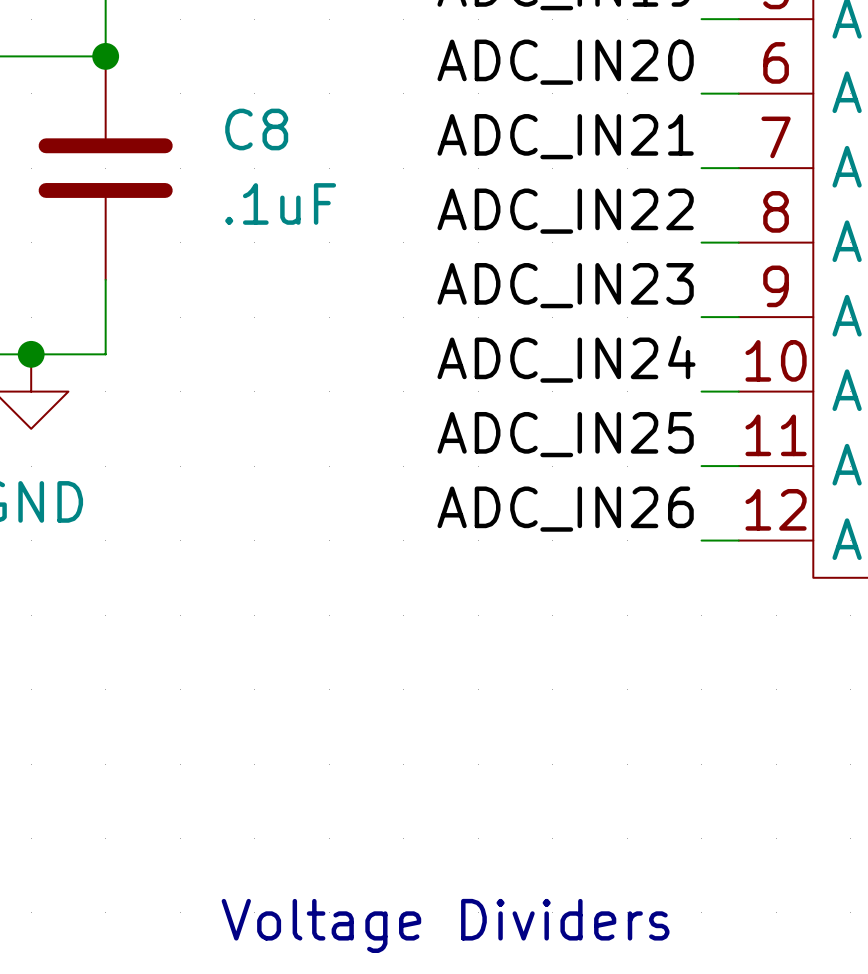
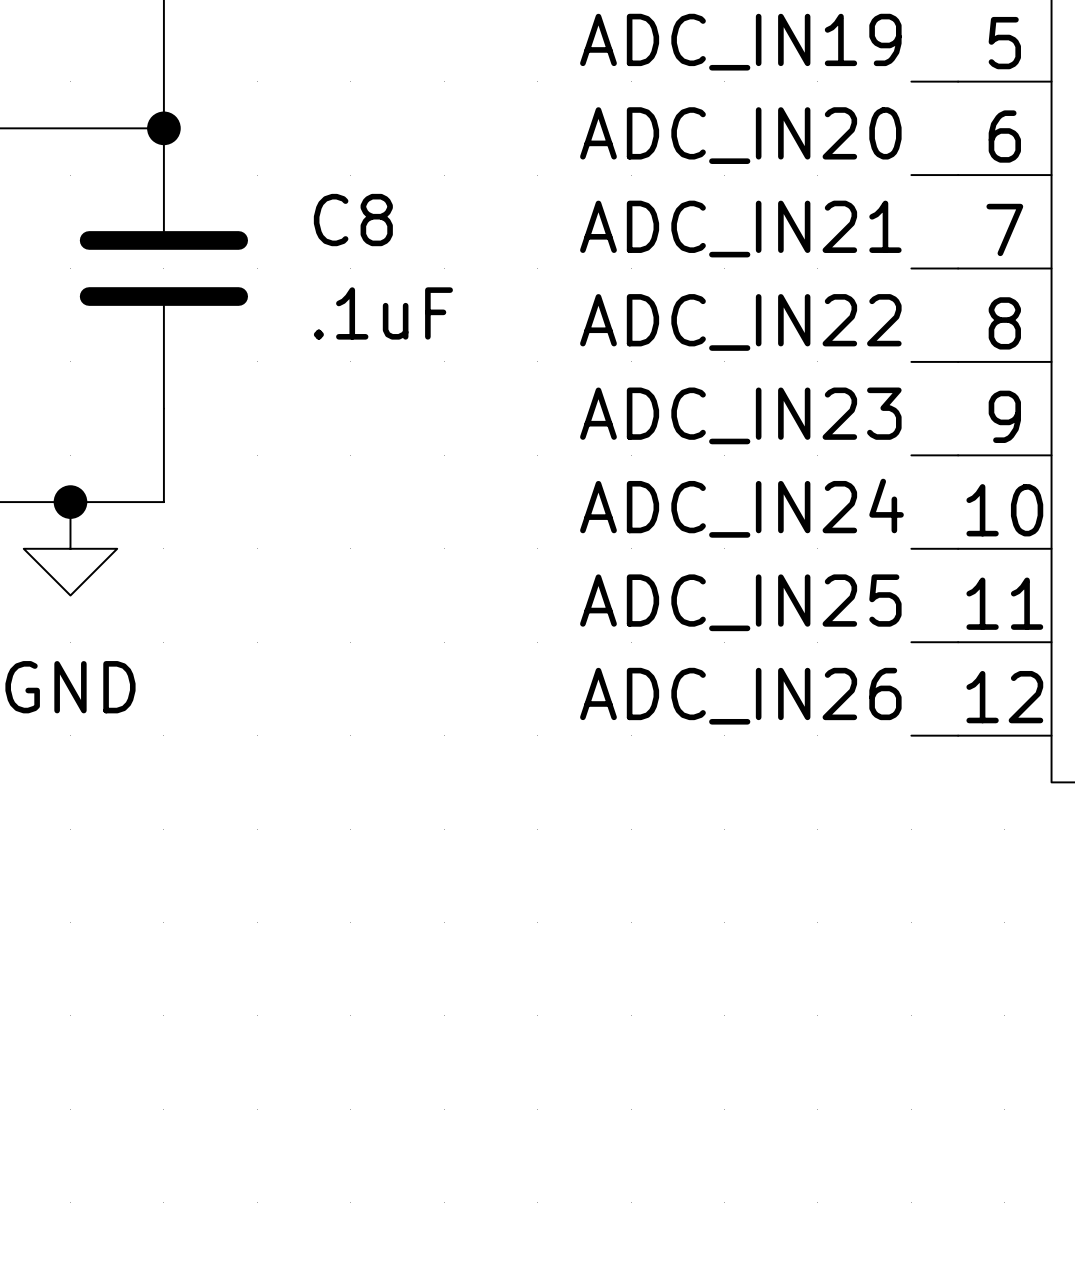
text: Voltage Dividers (445, 925) -> none

